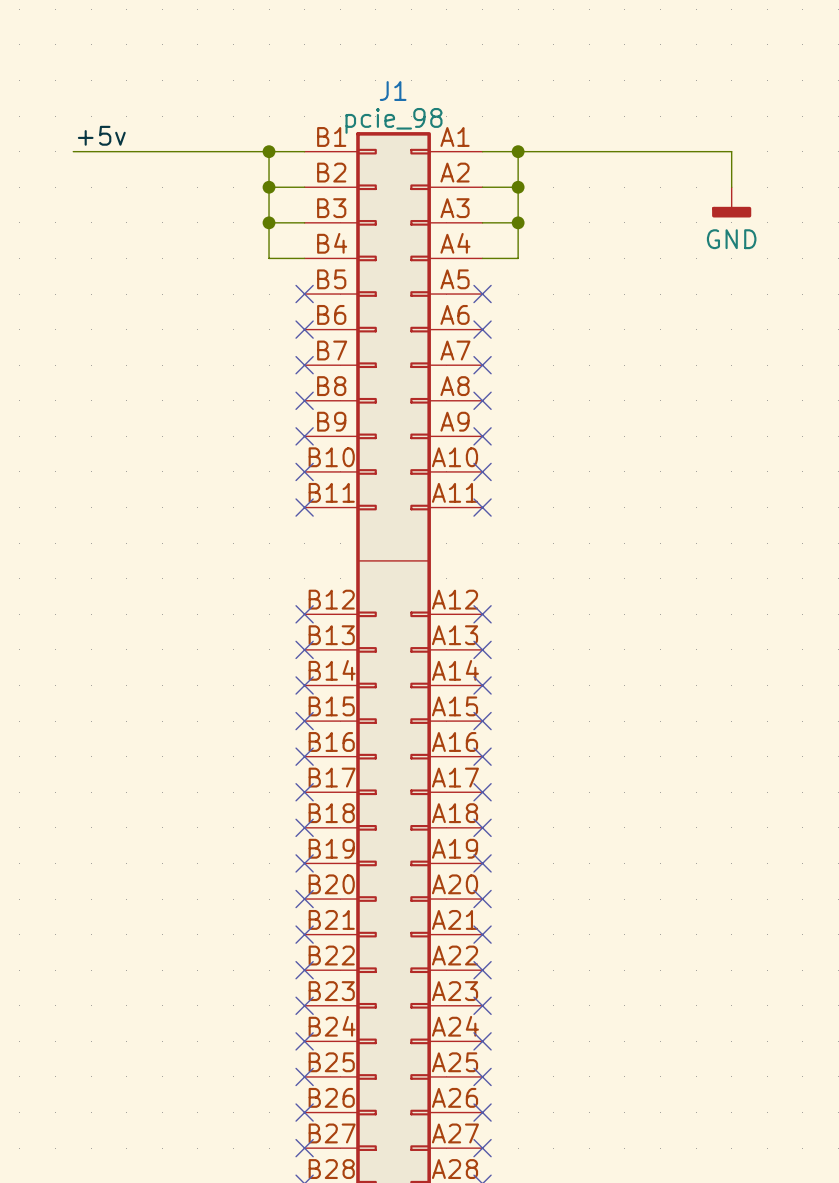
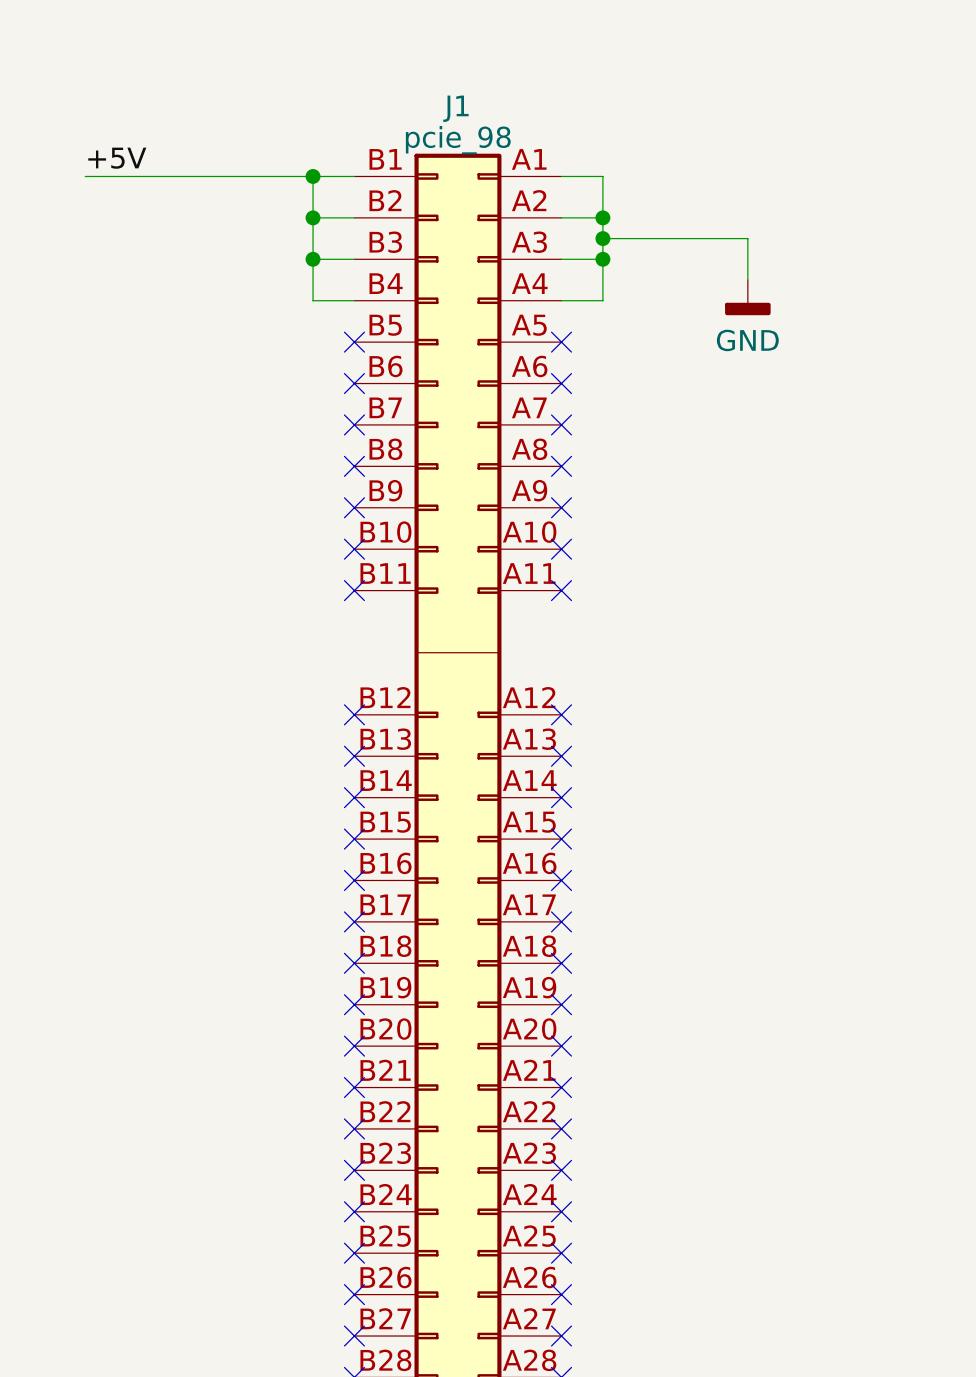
label: +5v (101, 135) -> +5V (117, 158)
wire: (518, 151) (731, 151) (731, 187) -> none
junction position: (518, 151) -> (602, 238)
power symbol position: GND (731, 202) -> GND (747, 297)
wire: none -> (602, 238) (747, 238) (747, 280)

